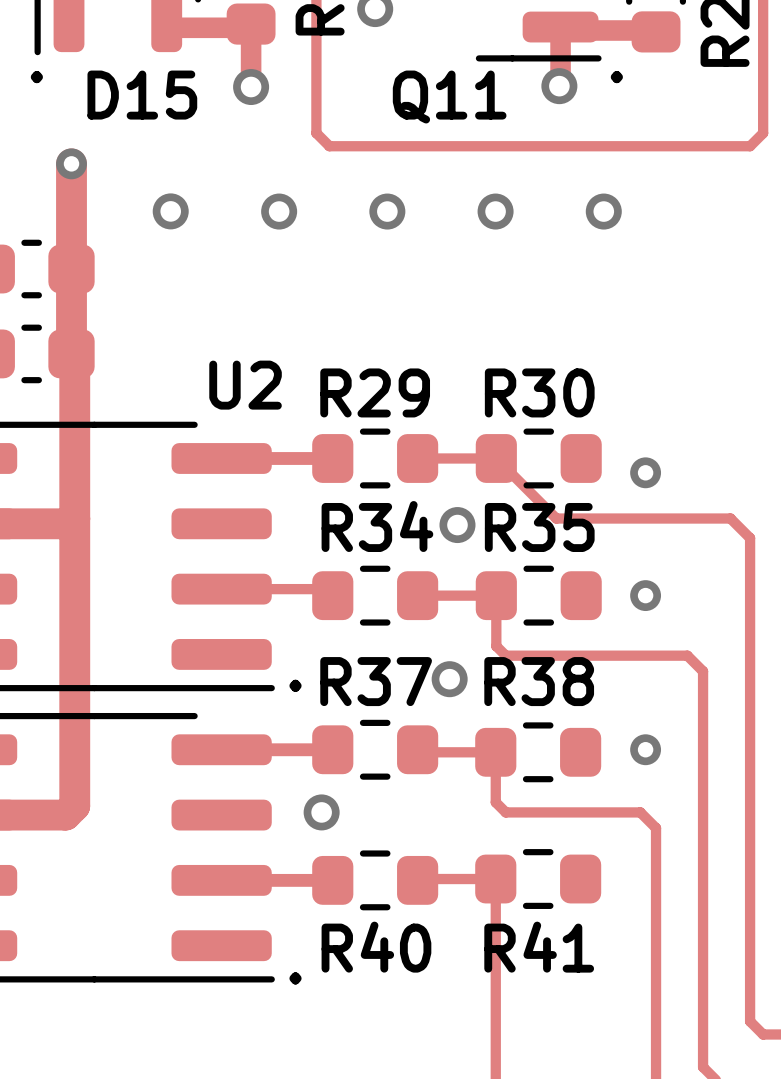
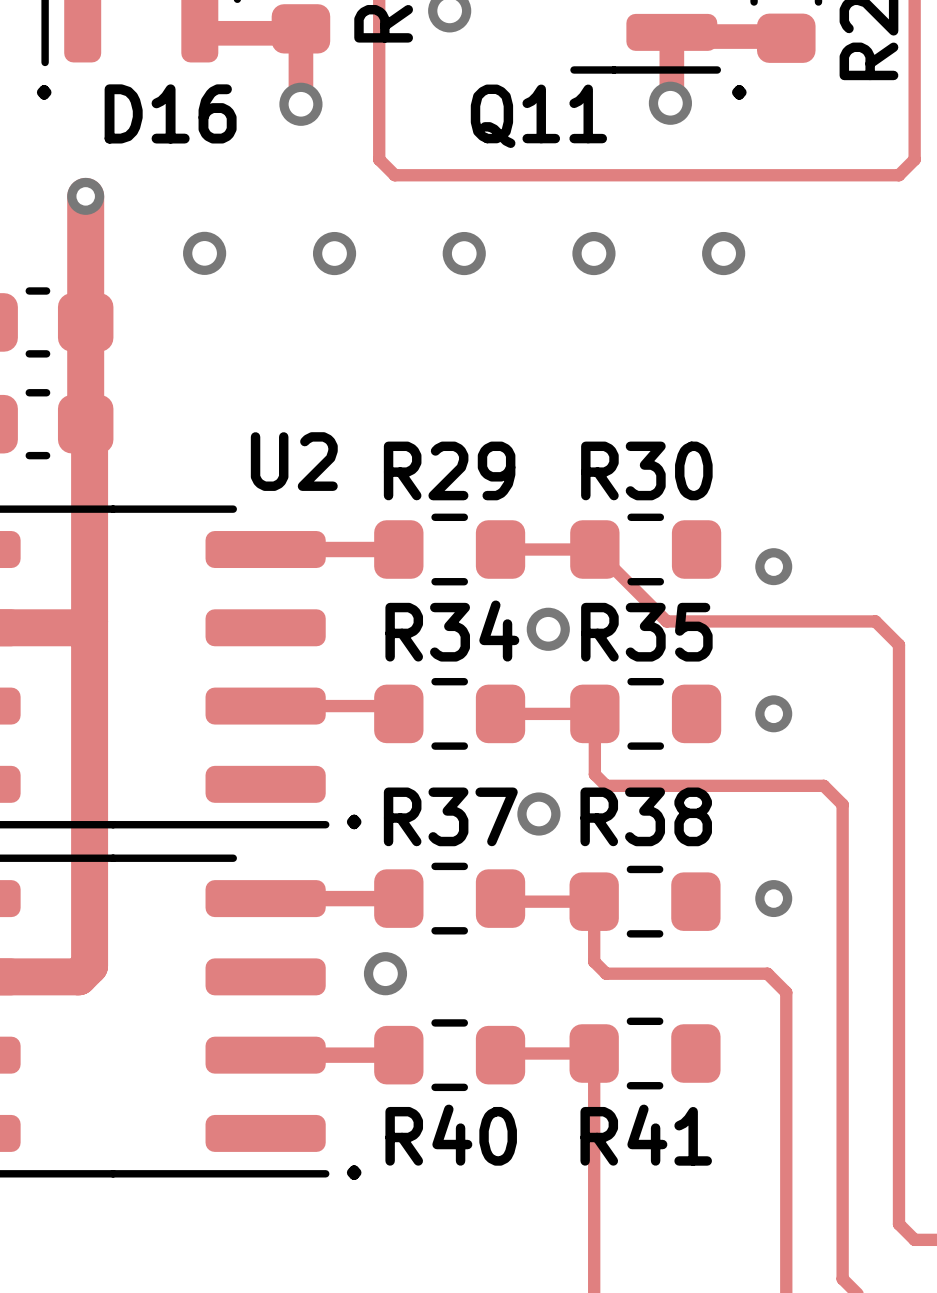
D15 name: D15 (142, 95) -> D16 (170, 113)

